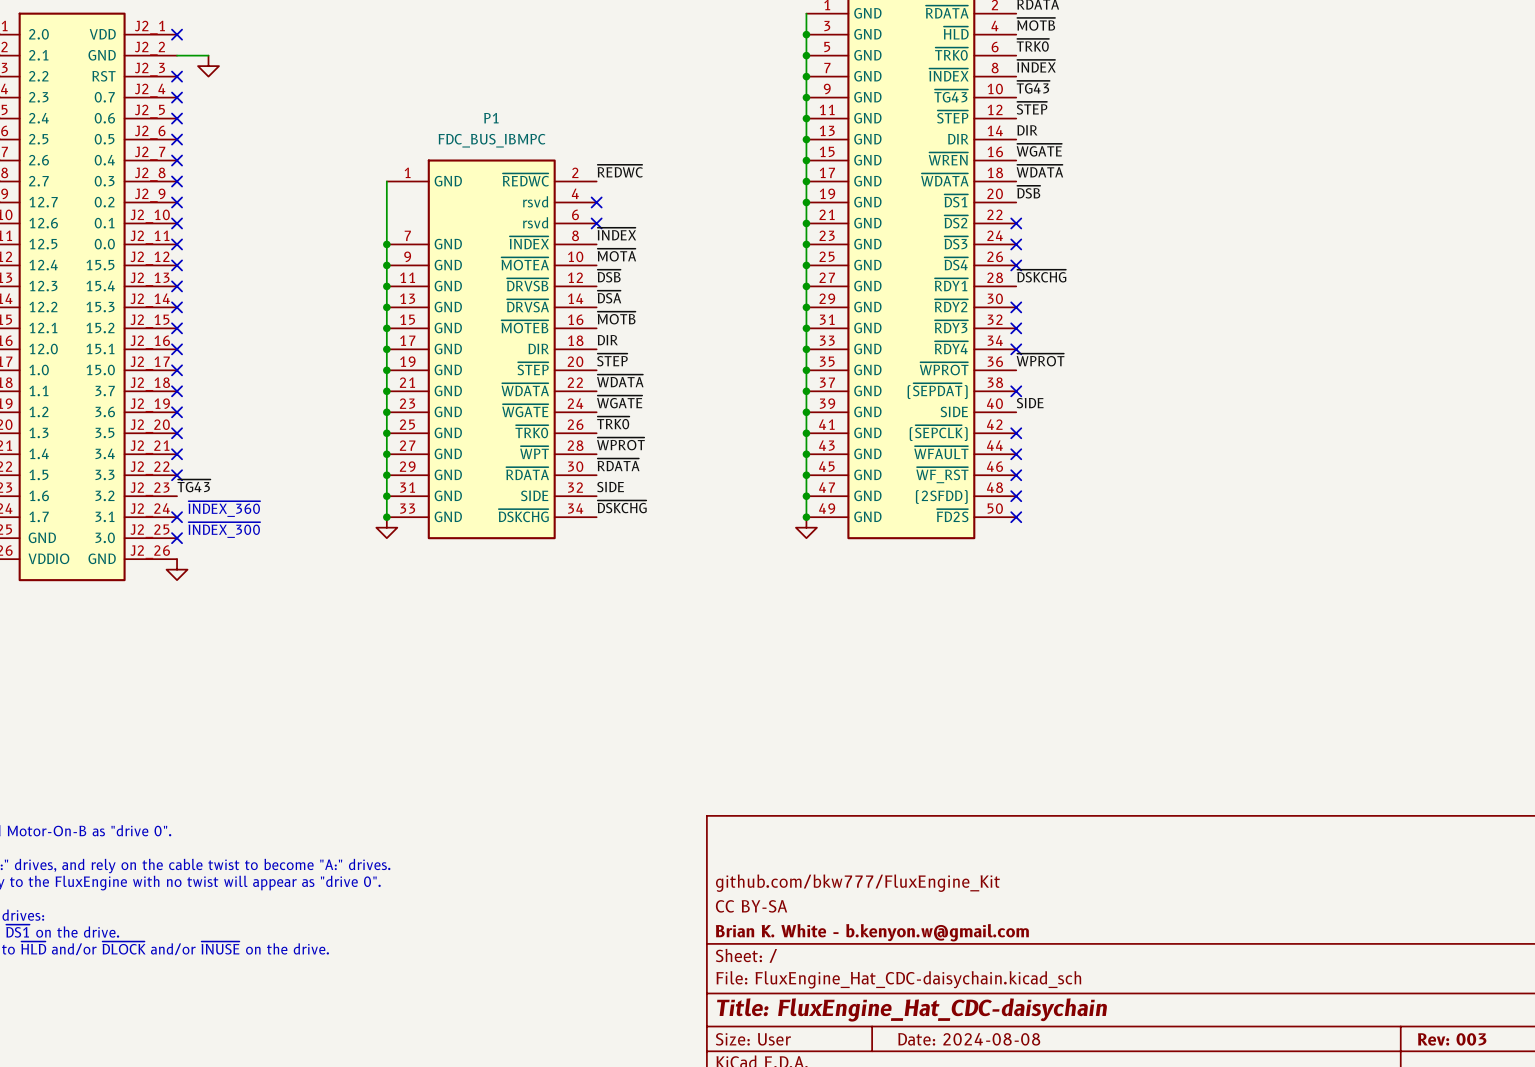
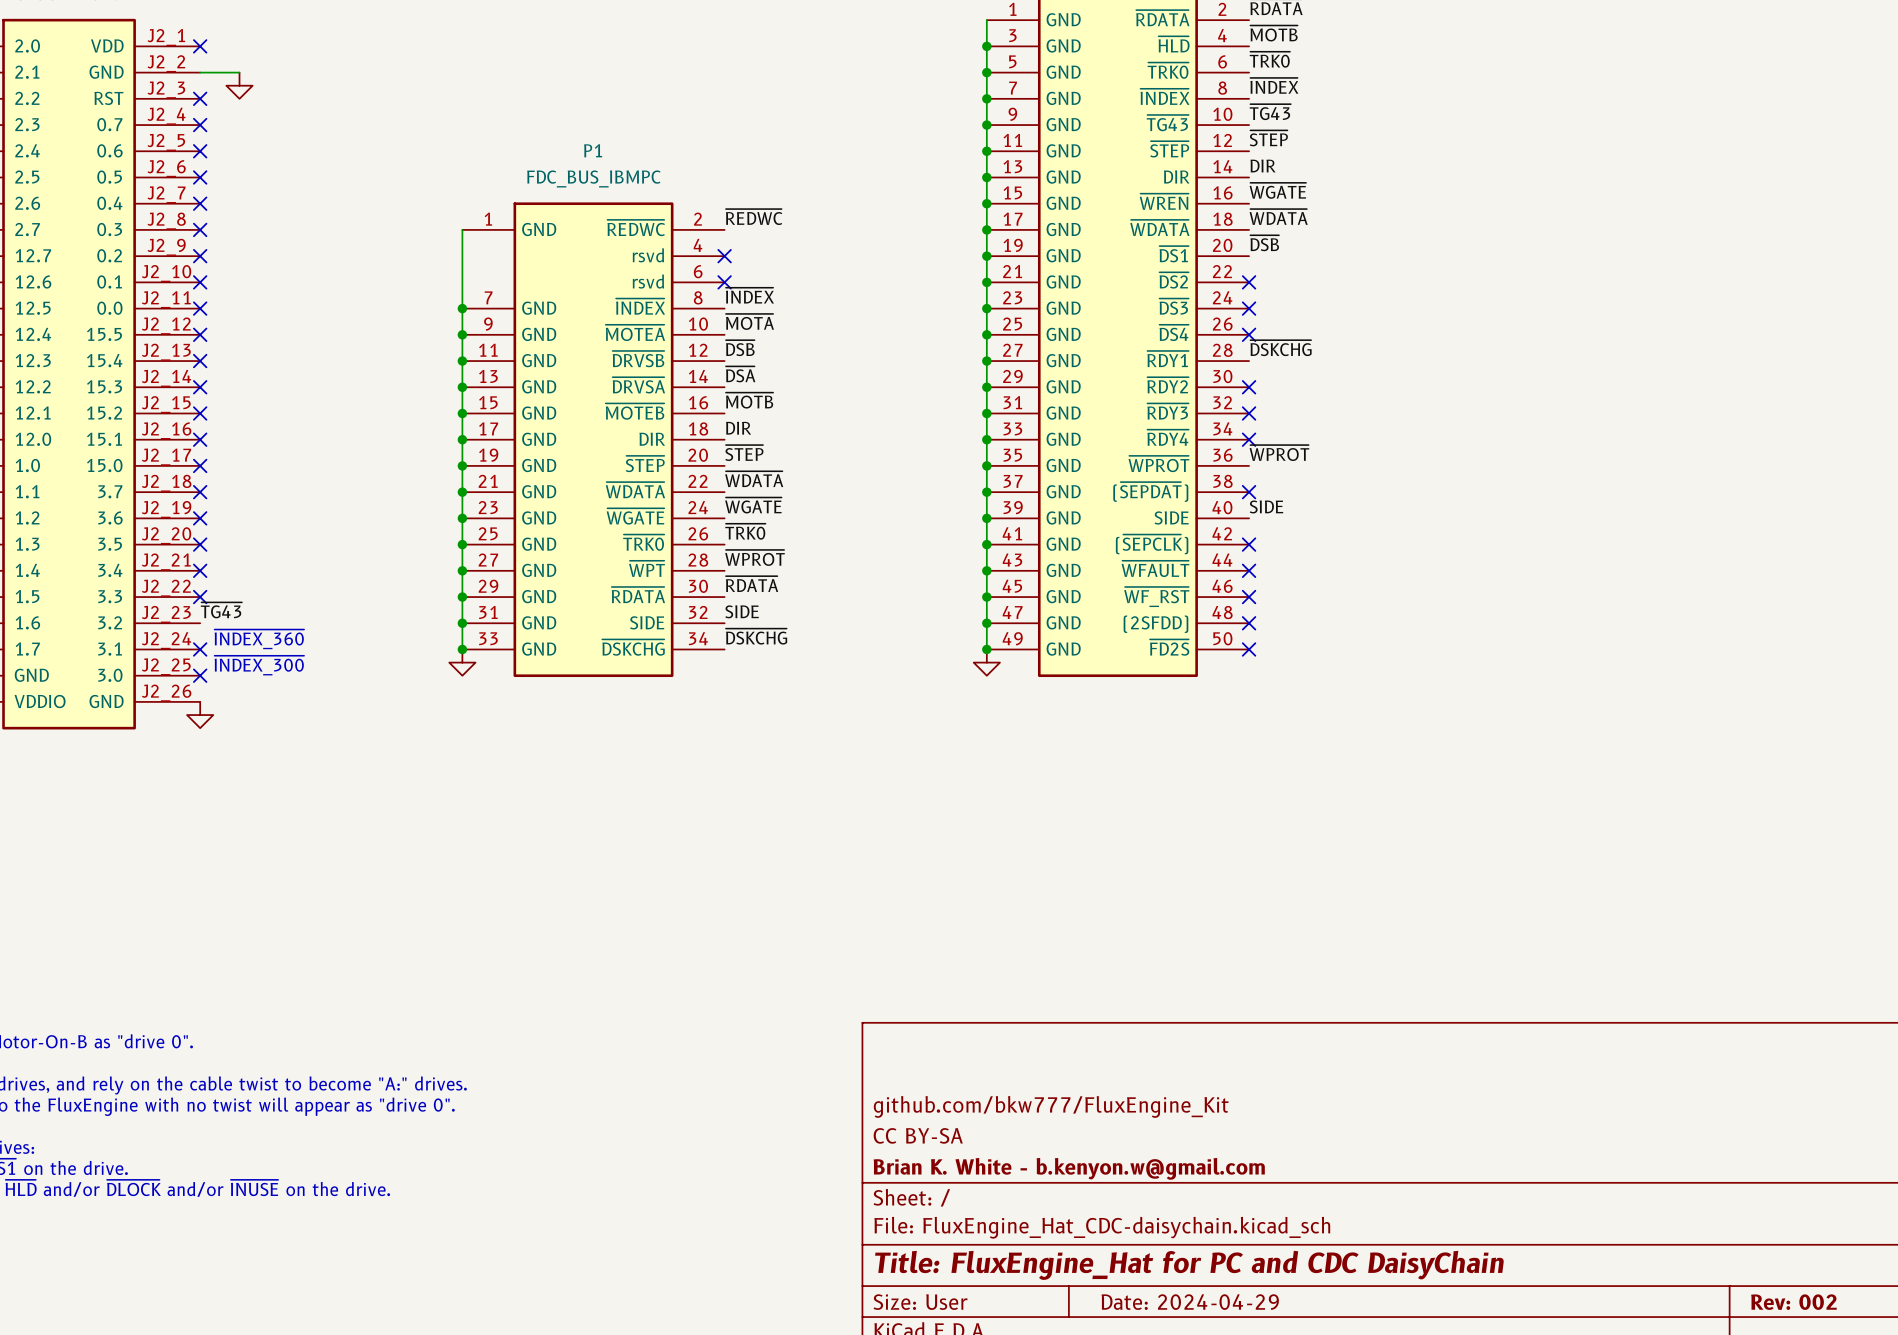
title block: Title: FluxEngine_Hat_CDC-daisychain (911, 1009) -> Title: FluxEngine_Hat for PC and CDC DaisyChain (1189, 1265)
title block: Date: 2024-08-08 (969, 1039) -> Date: 2024-04-29 (1190, 1302)
title block: Rev: 003 (1452, 1039) -> Rev: 002 (1793, 1302)

